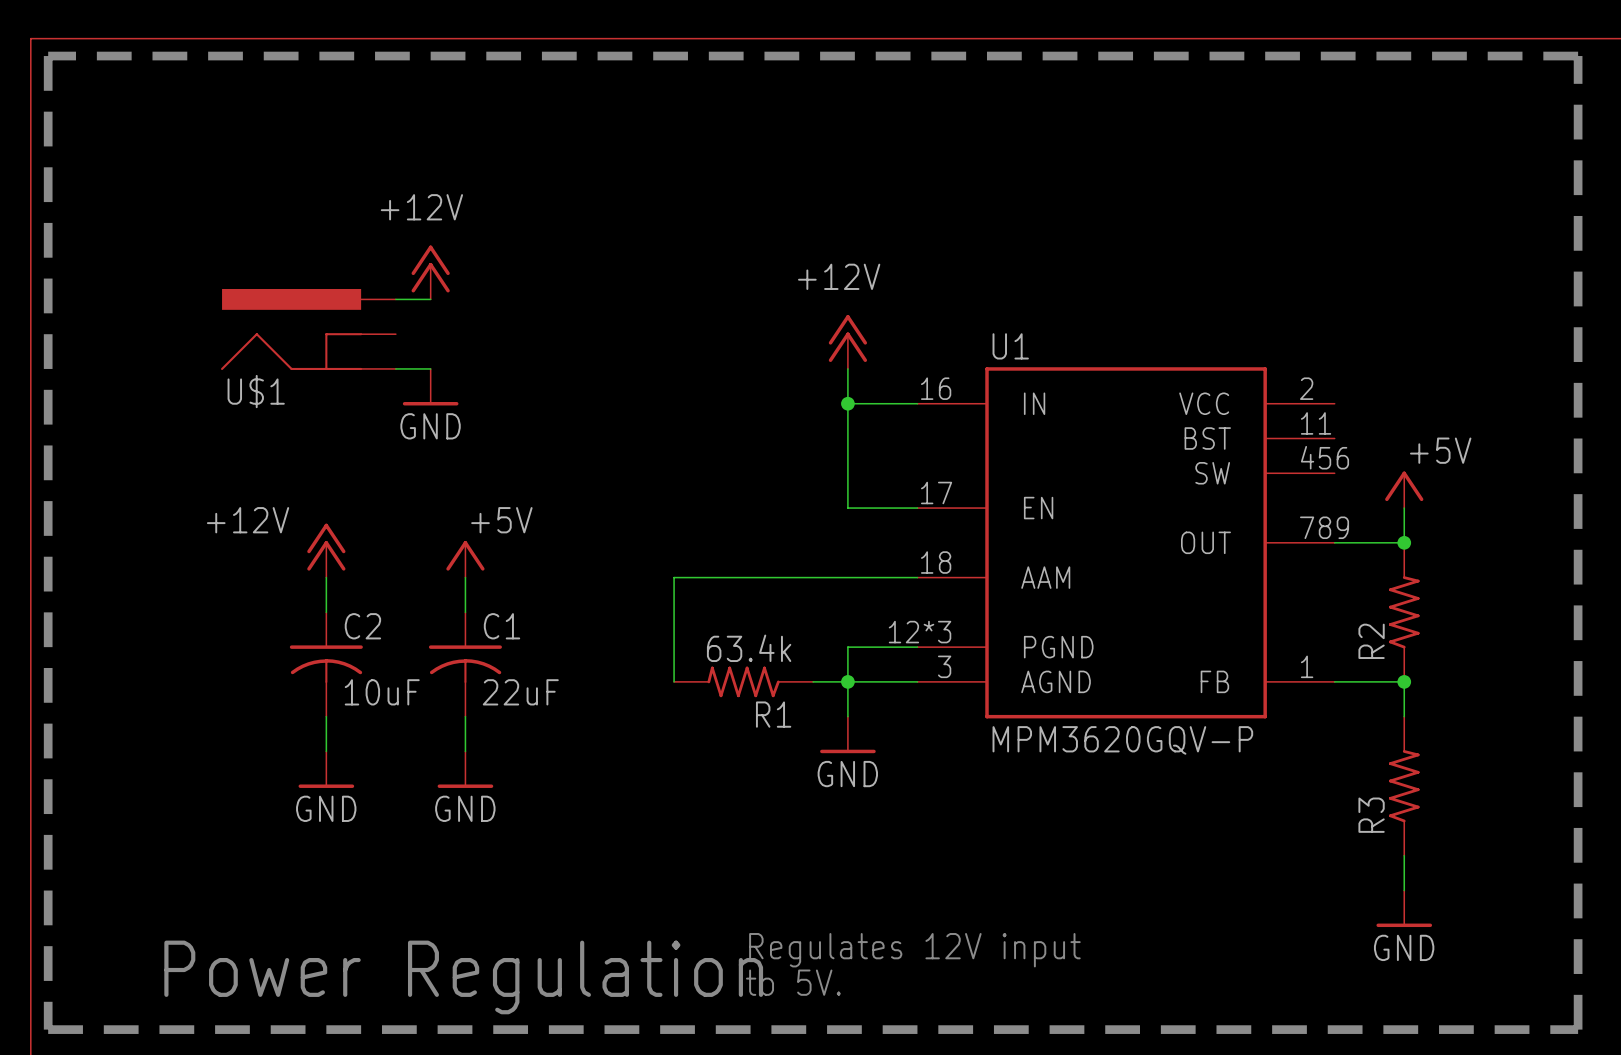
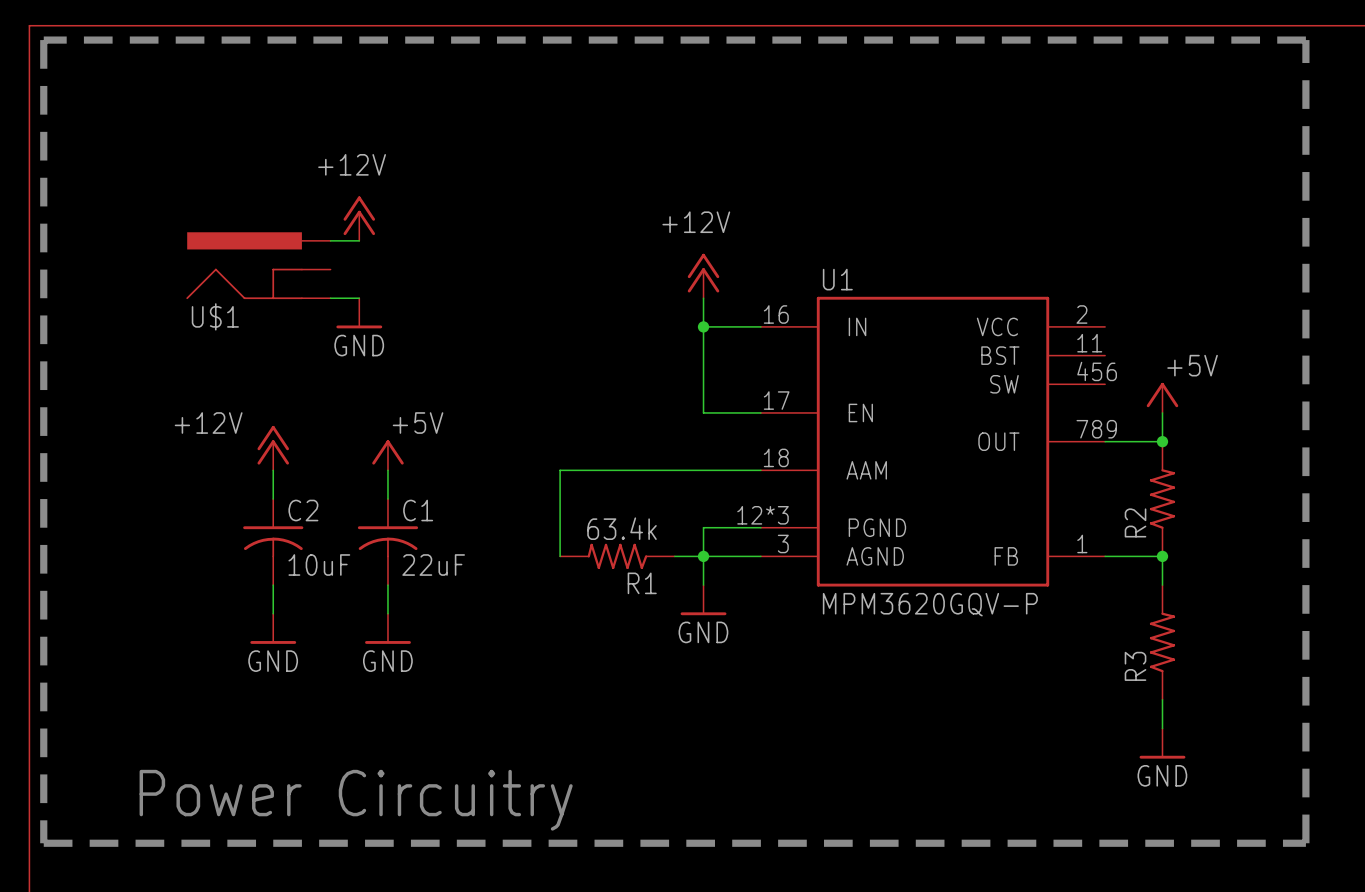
text: Regulates 12V input (914, 950) -> none
text: Power Regulation (463, 977) -> Power Circuitry (356, 800)
text: to 5V. (793, 982) -> none

